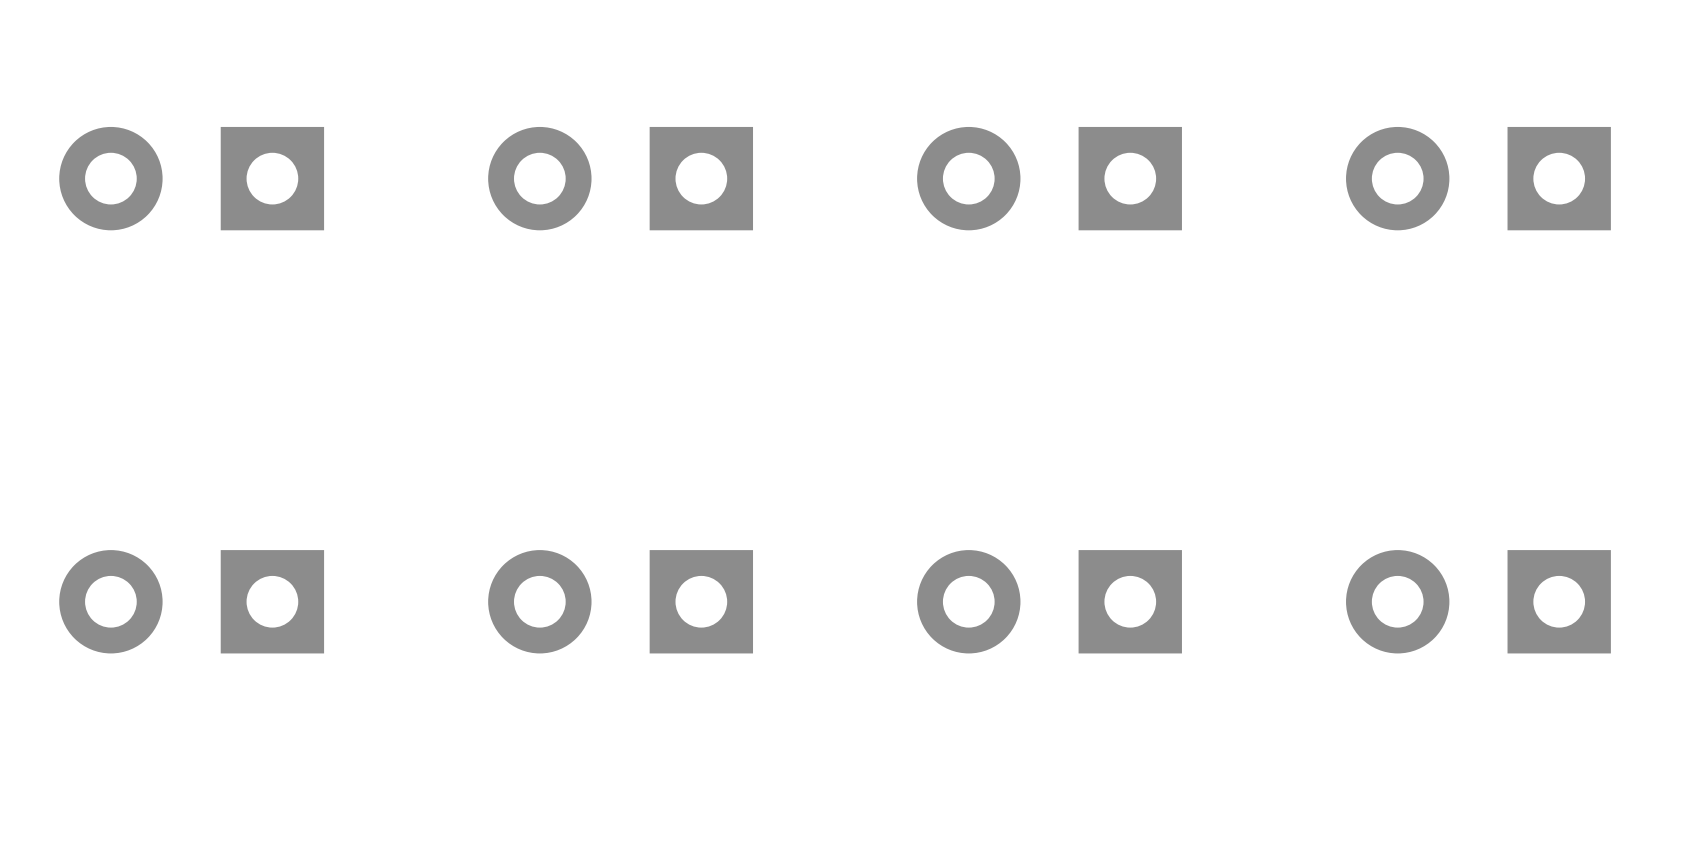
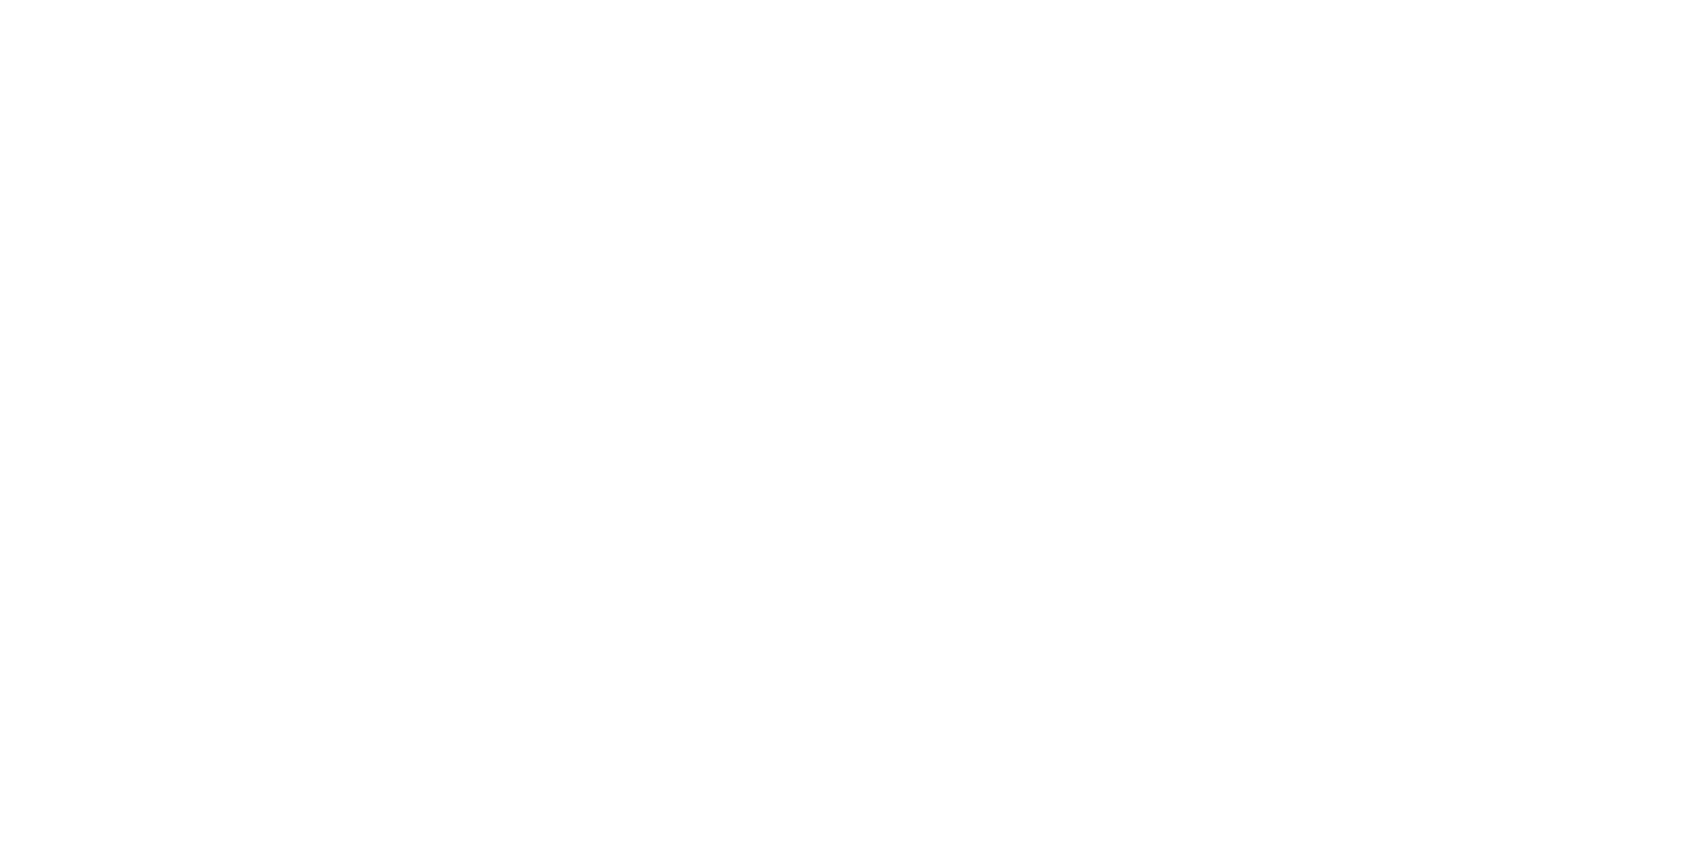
part: (191, 178) -> none
part: (620, 178) -> none
part: (1049, 178) -> none
part: (1478, 178) -> none
part: (191, 601) -> none
part: (620, 601) -> none
part: (1049, 601) -> none
part: (1478, 601) -> none

